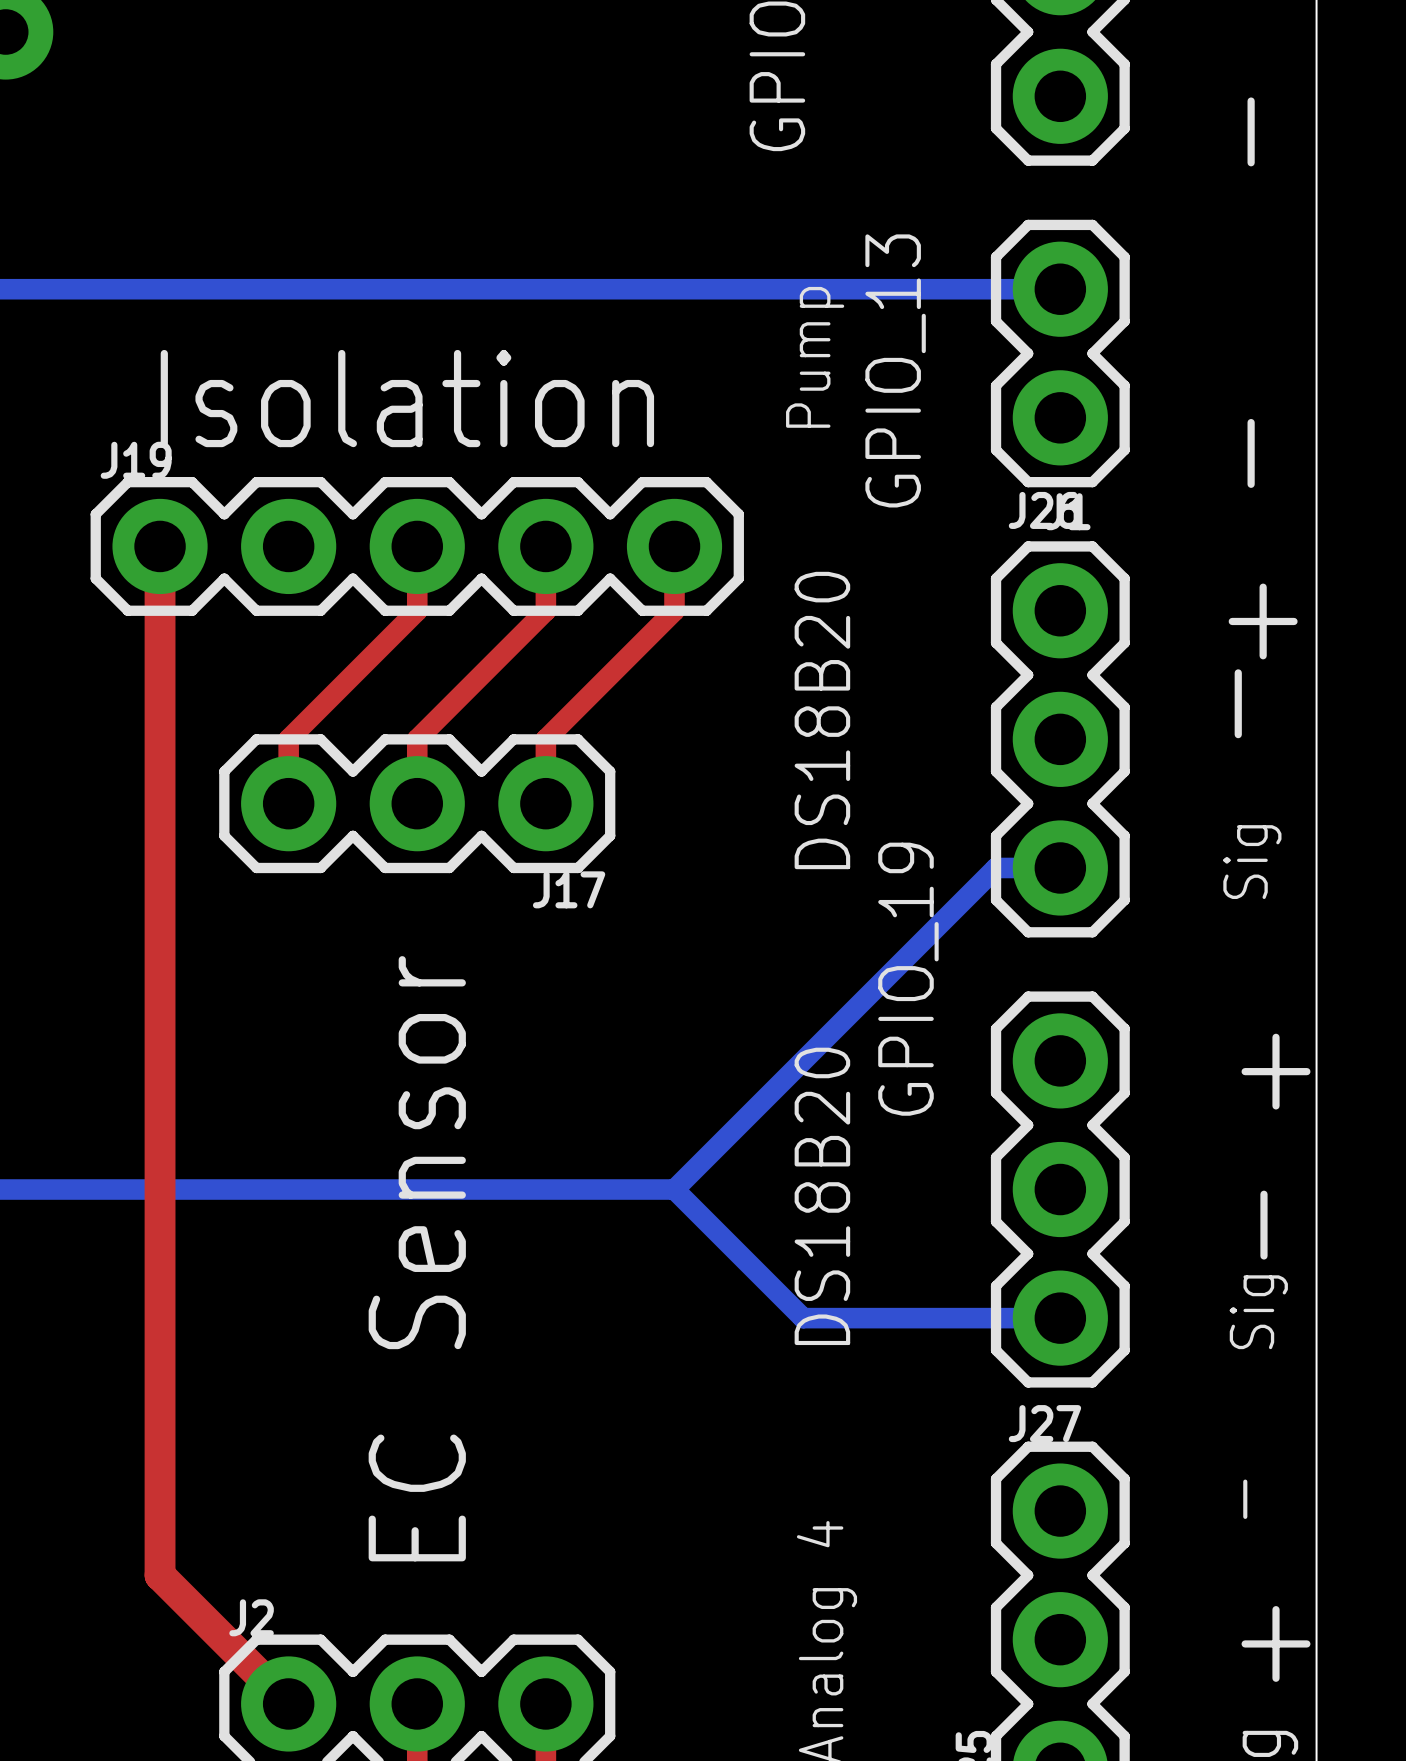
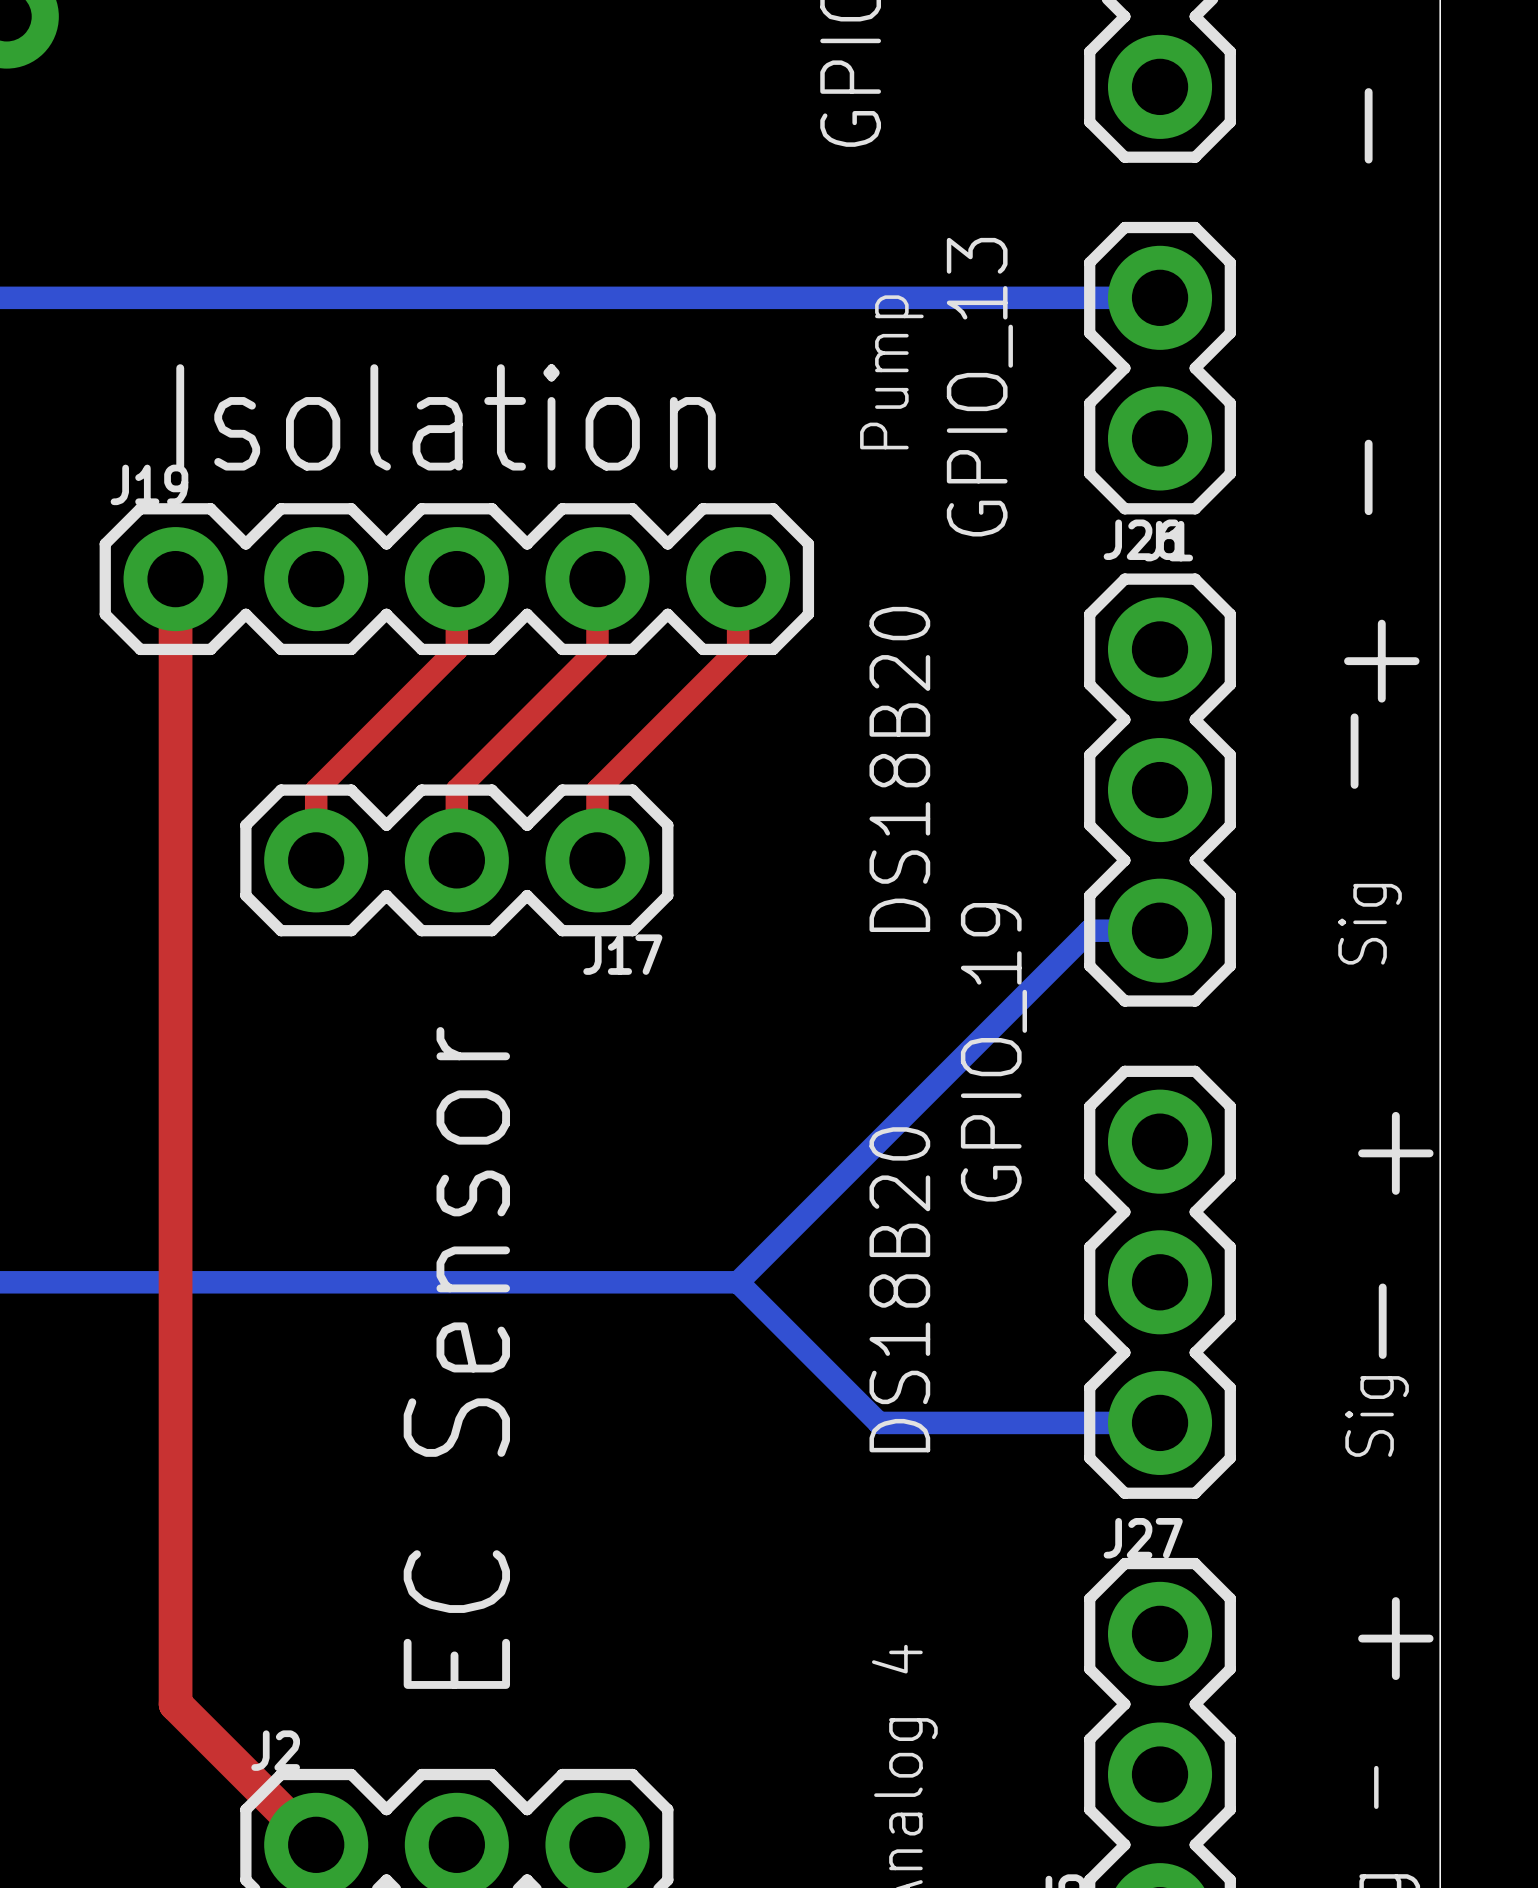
text: _ (1245, 1499) -> none
text: none -> + (1395, 1638)
text: + (1276, 1643) -> _ (1376, 1787)

